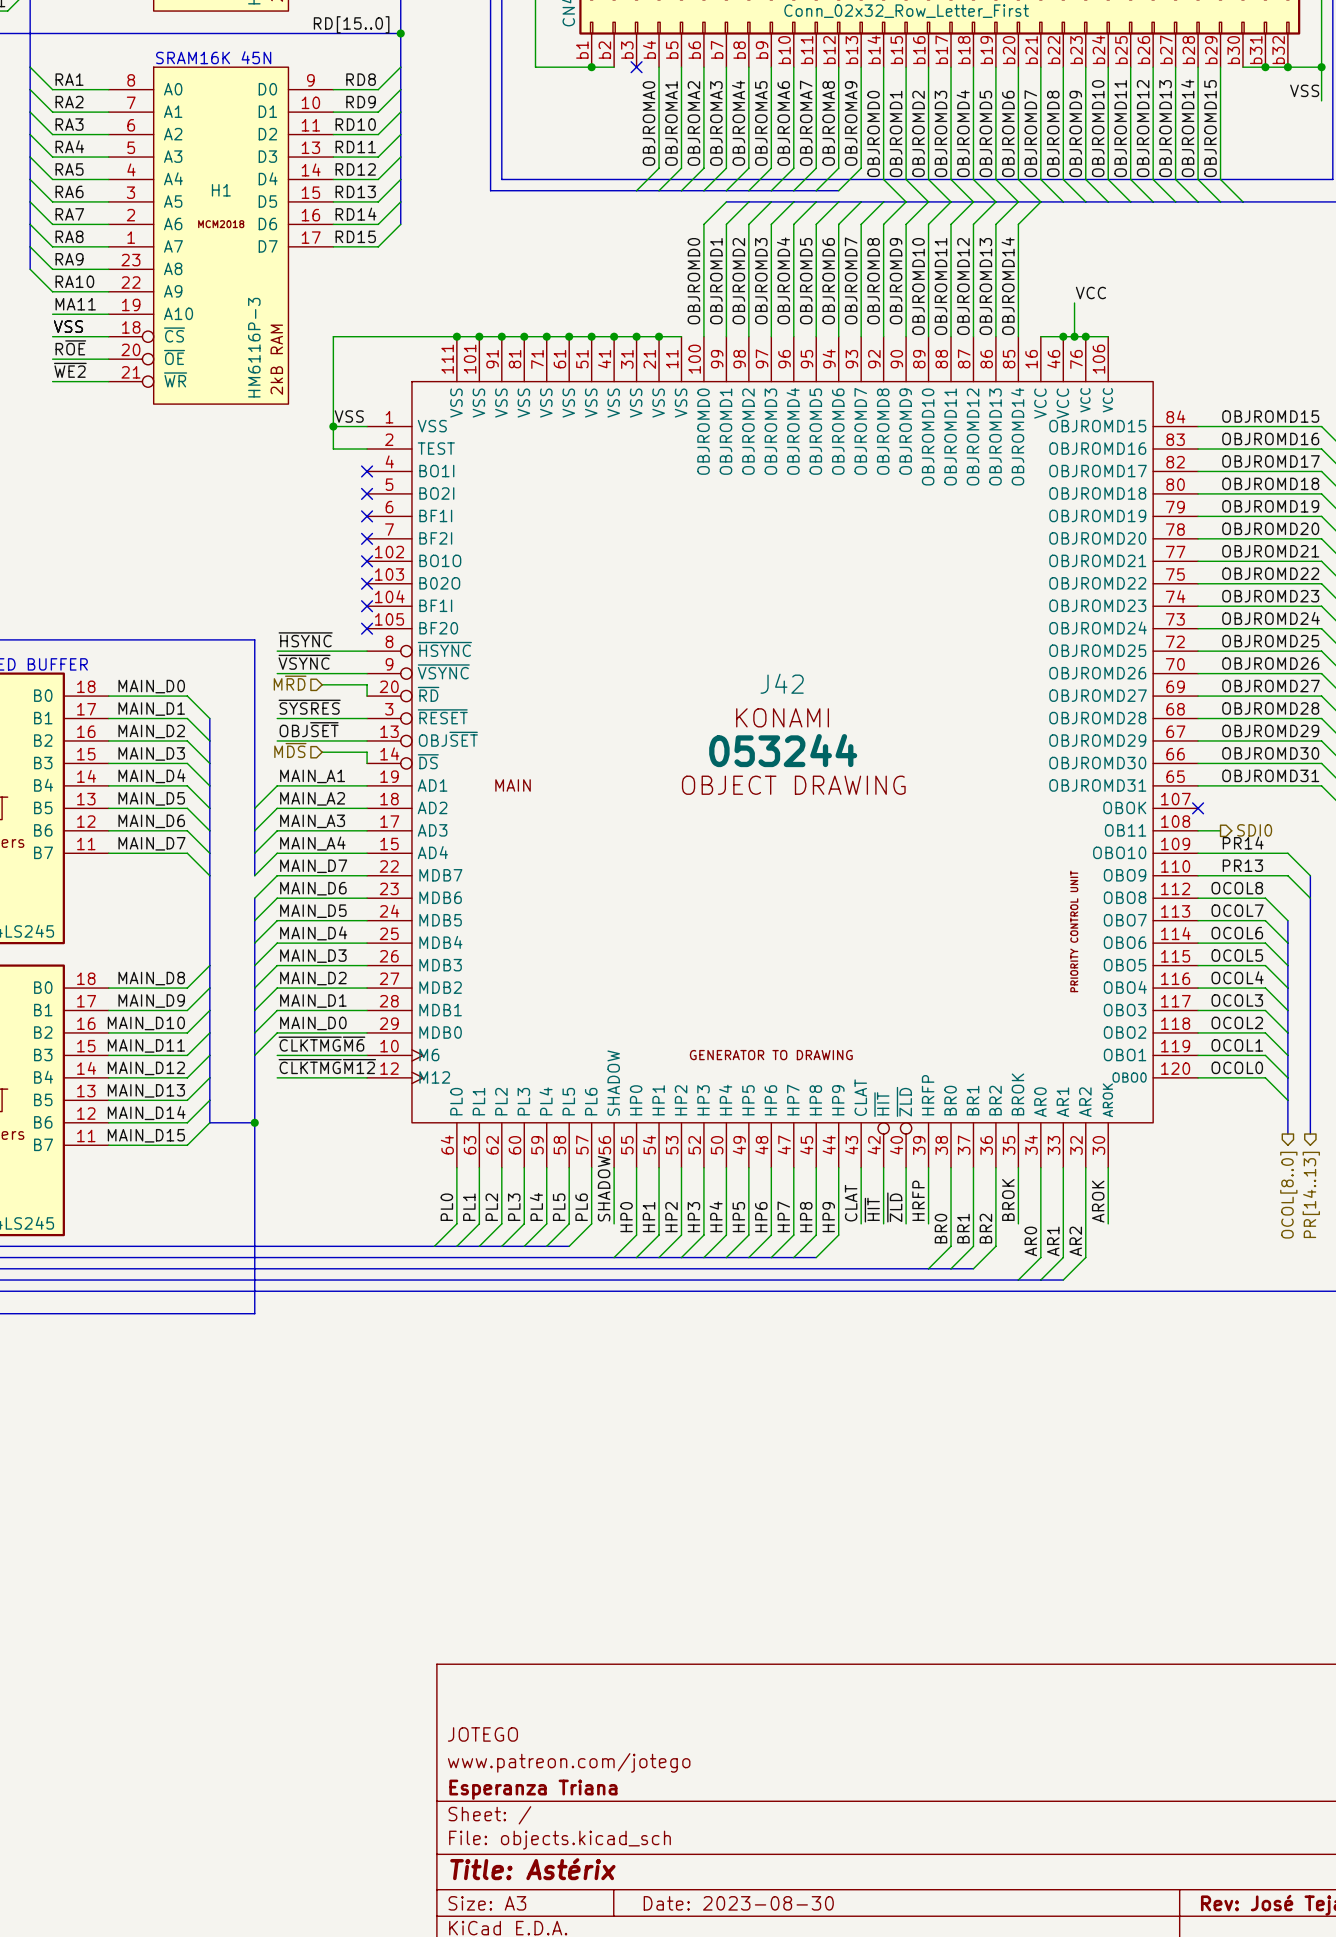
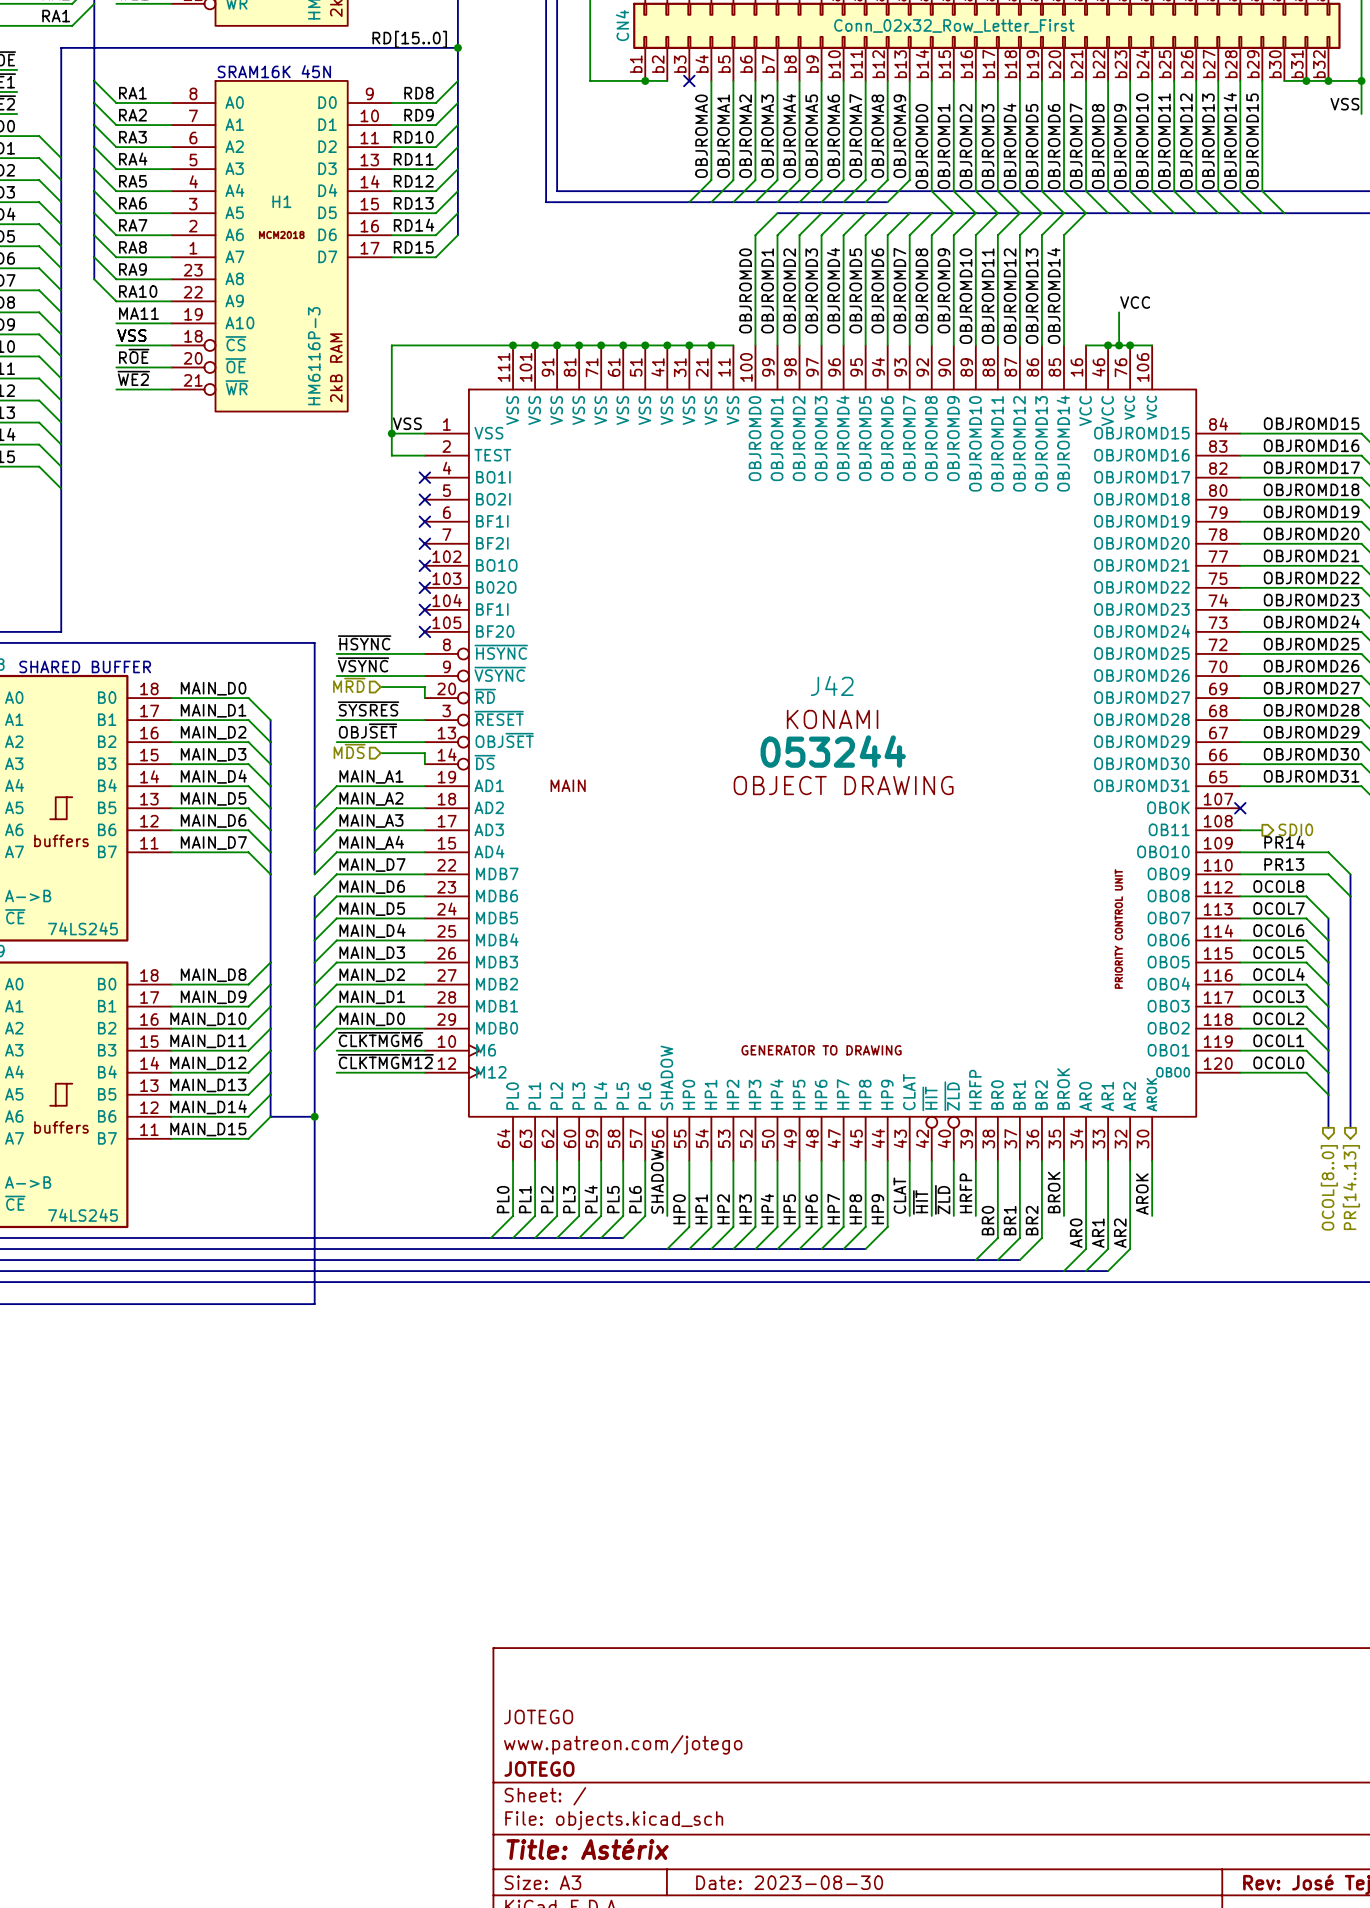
title block: Esperanza Triana (533, 1789) -> JOTEGO (539, 1769)

